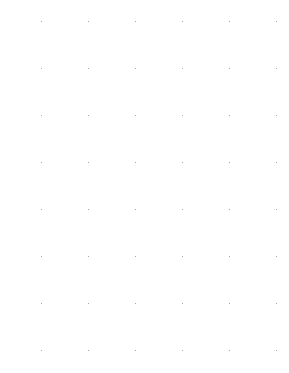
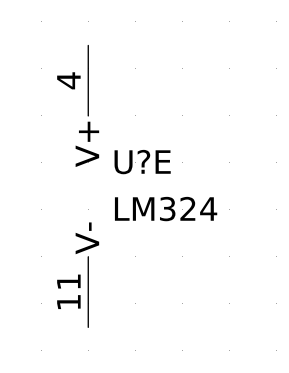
U?E: none -> LM324 (88, 186)

